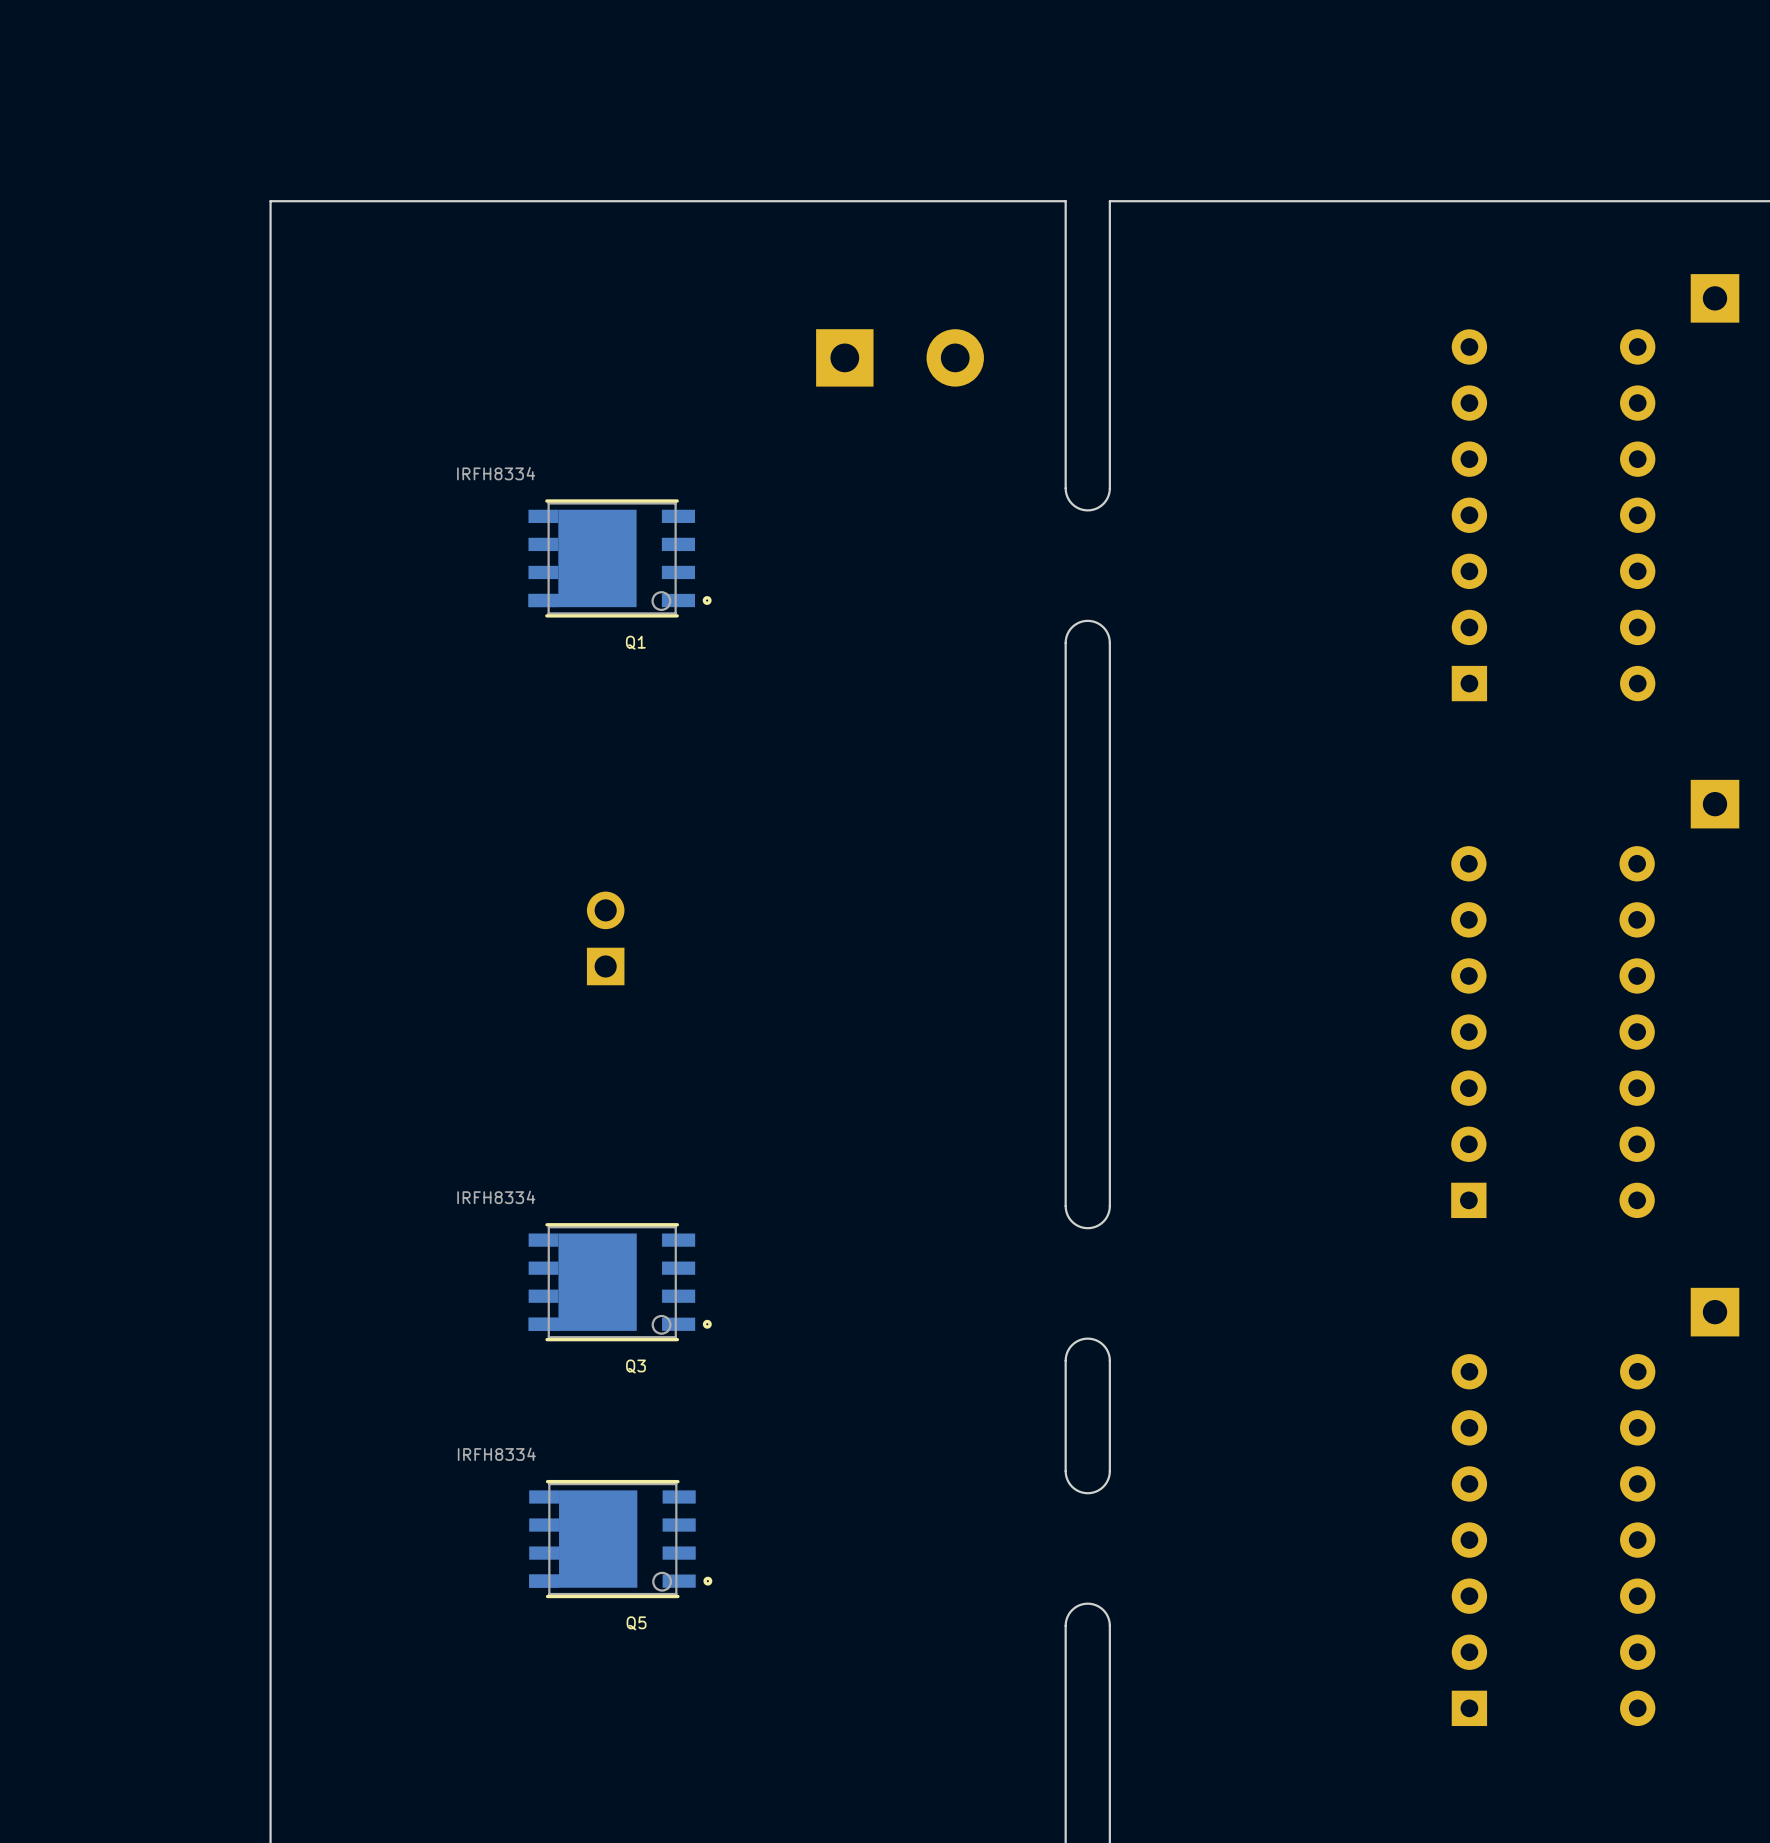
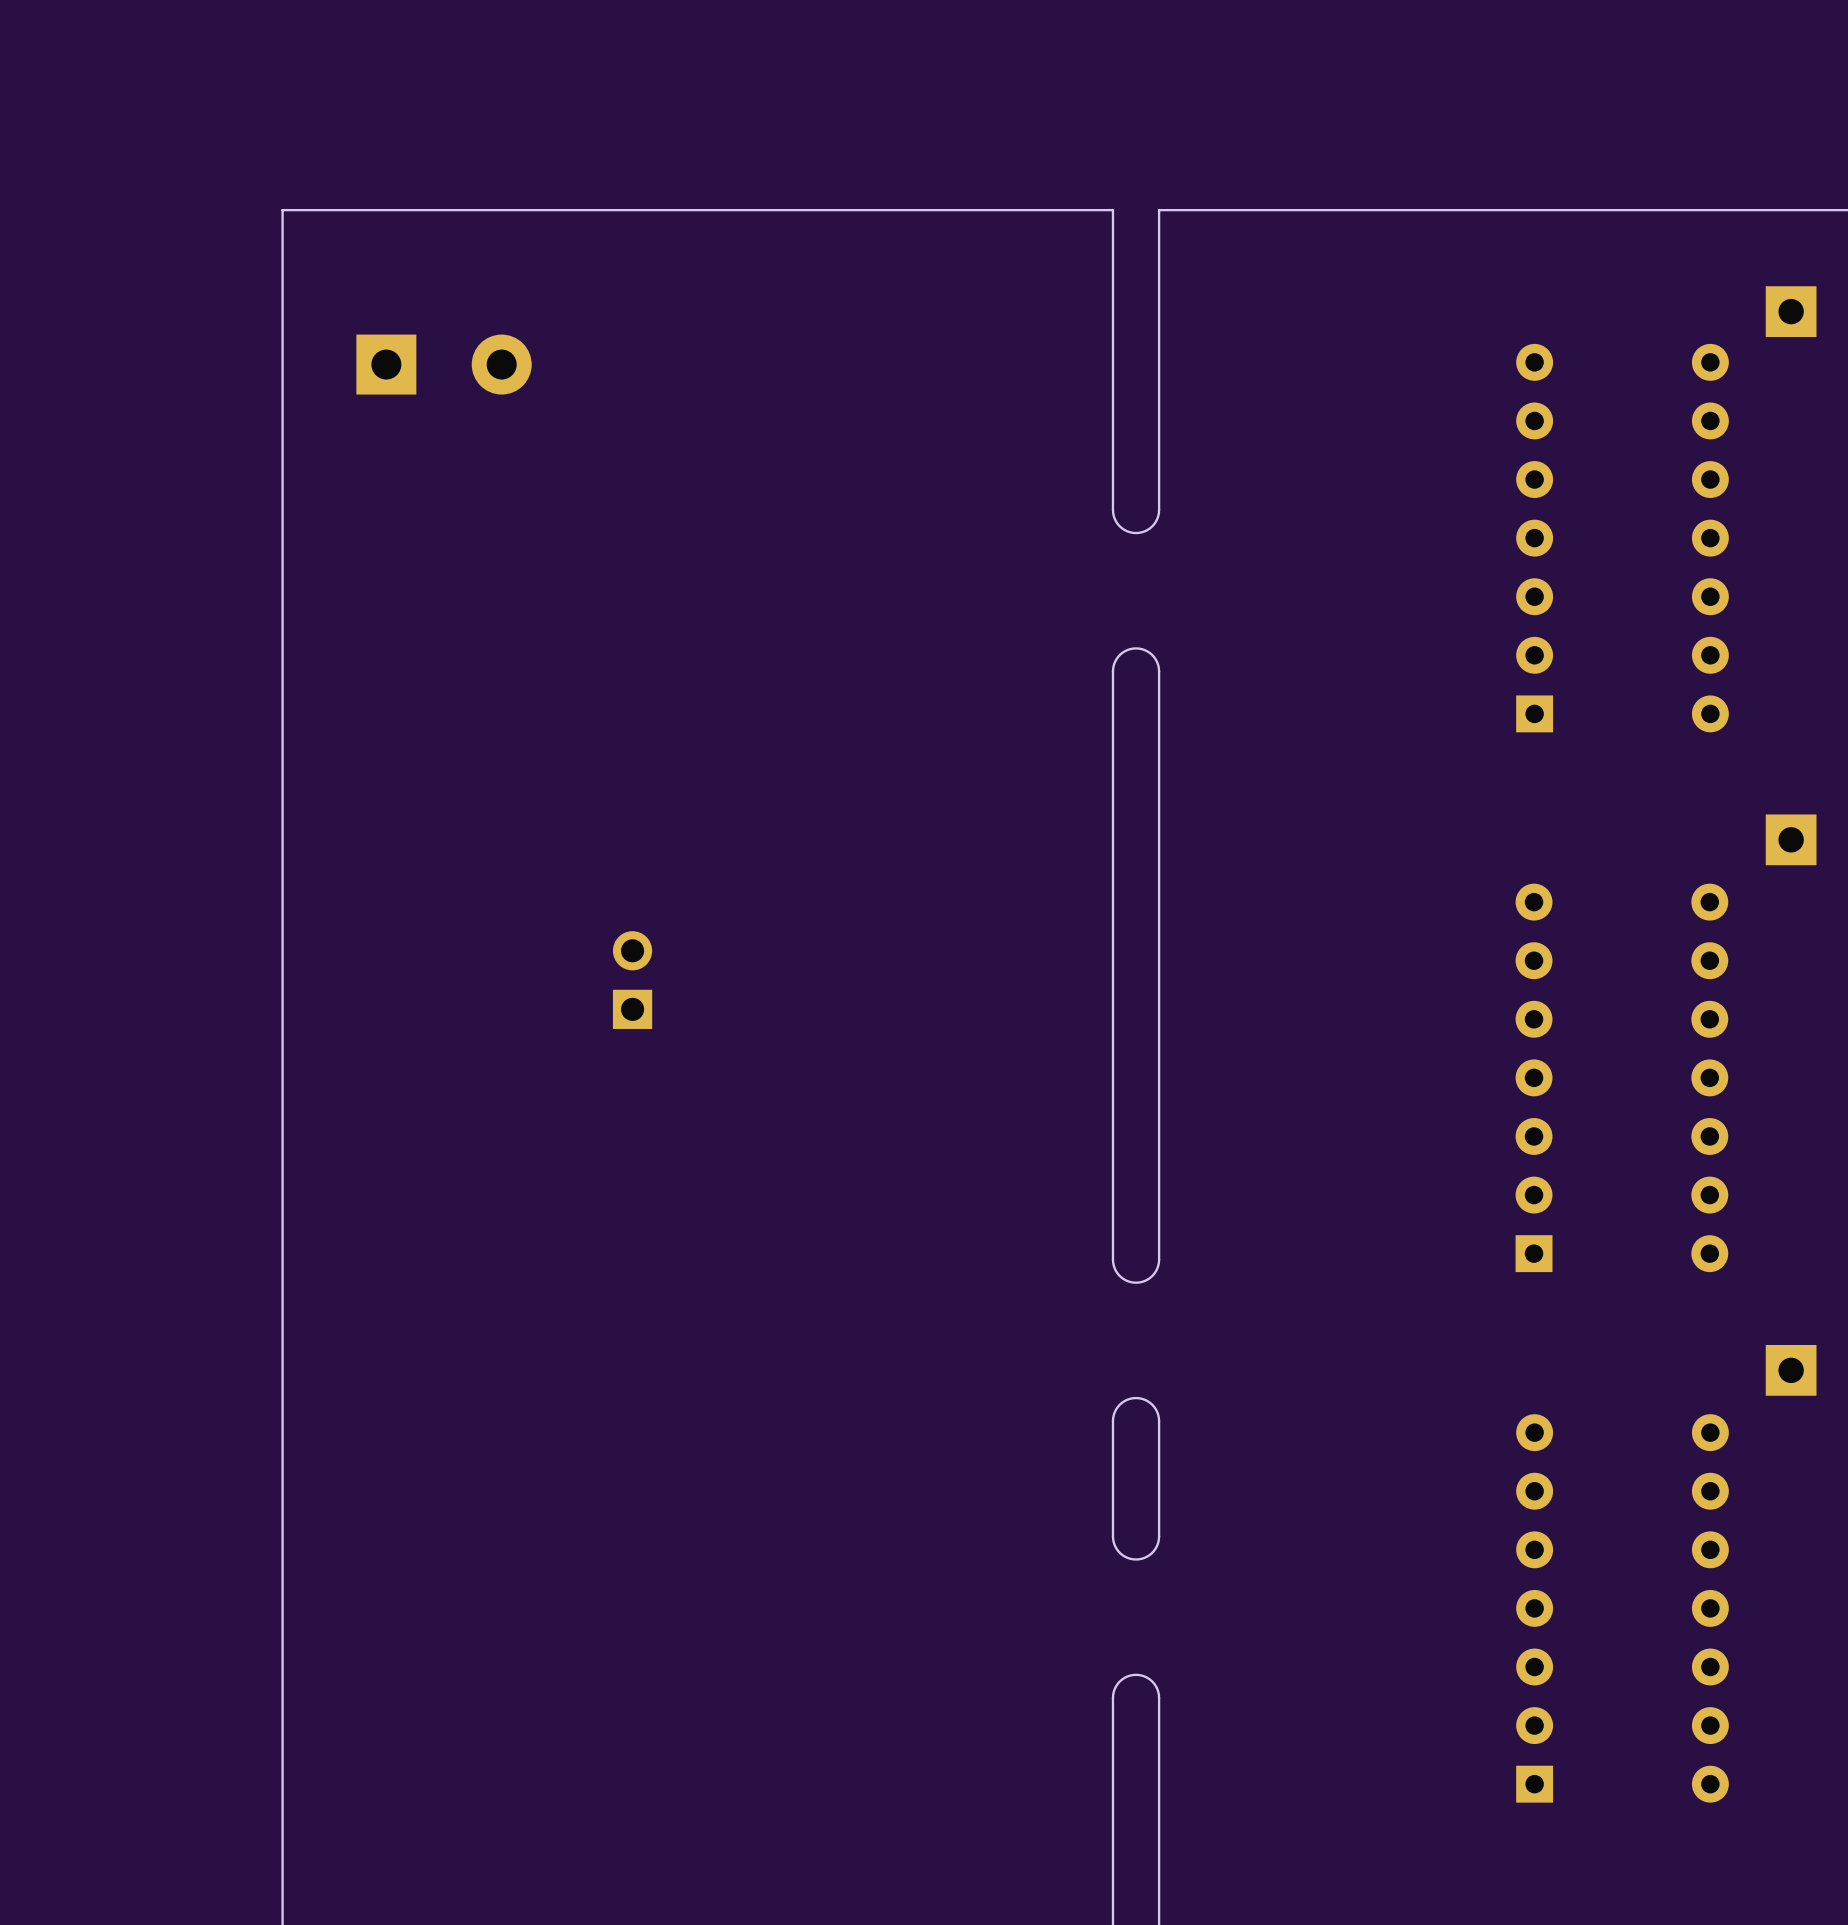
part position: (900, 357) -> (444, 364)
Q1: IRFH8334 (620, 558) -> none
Q3: IRFH8334 (620, 1282) -> none
Q5: IRFH8334 (620, 1539) -> none

